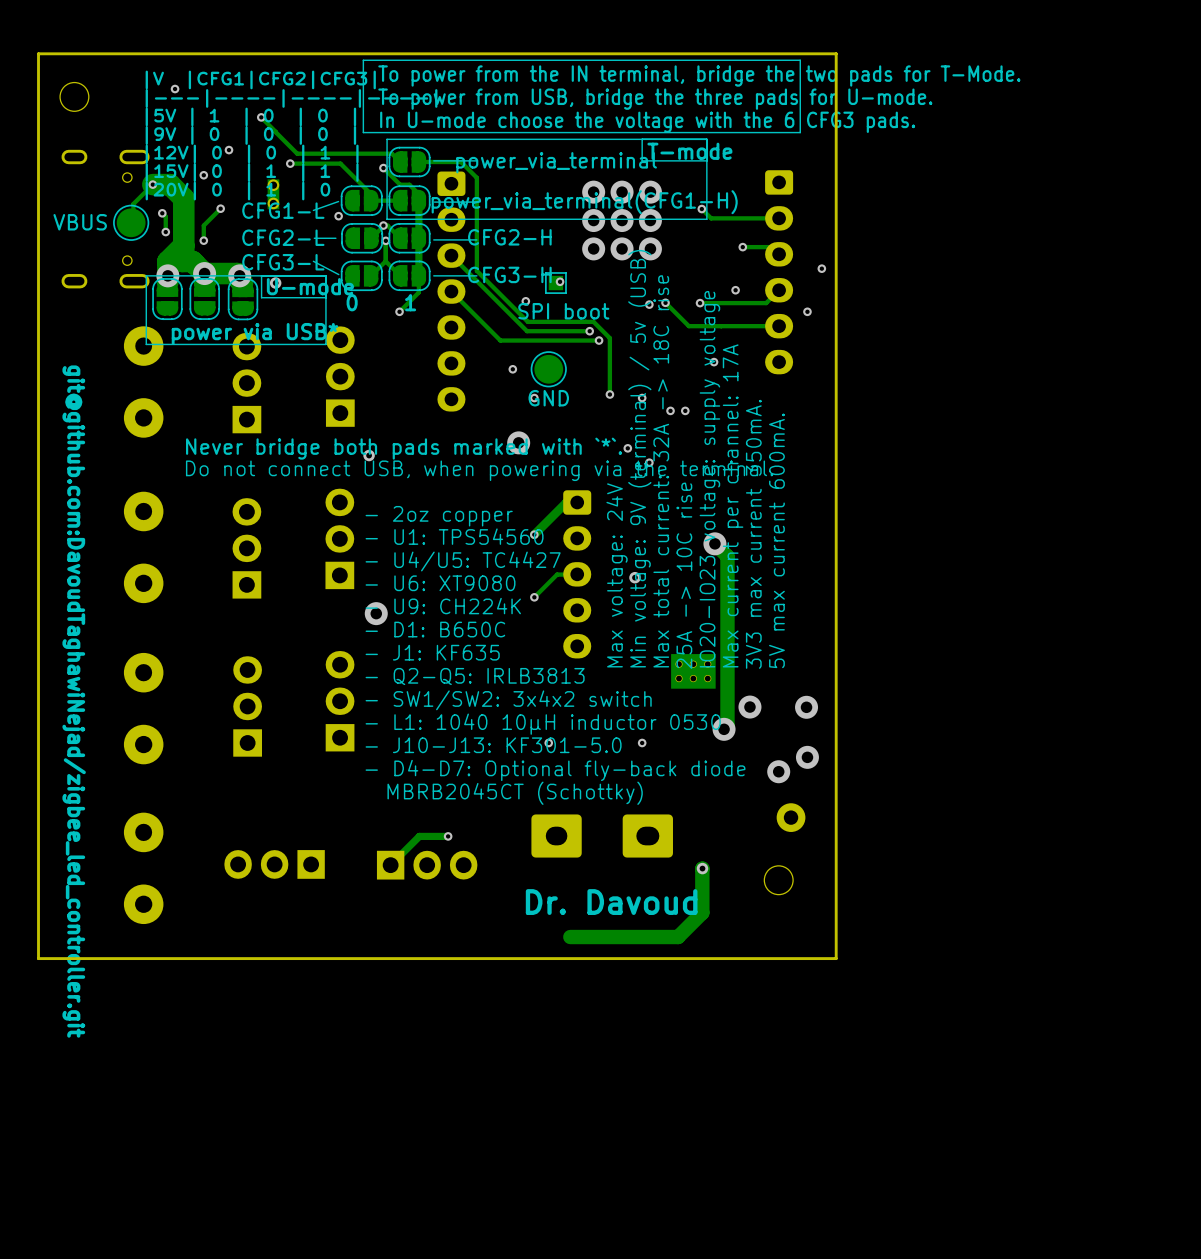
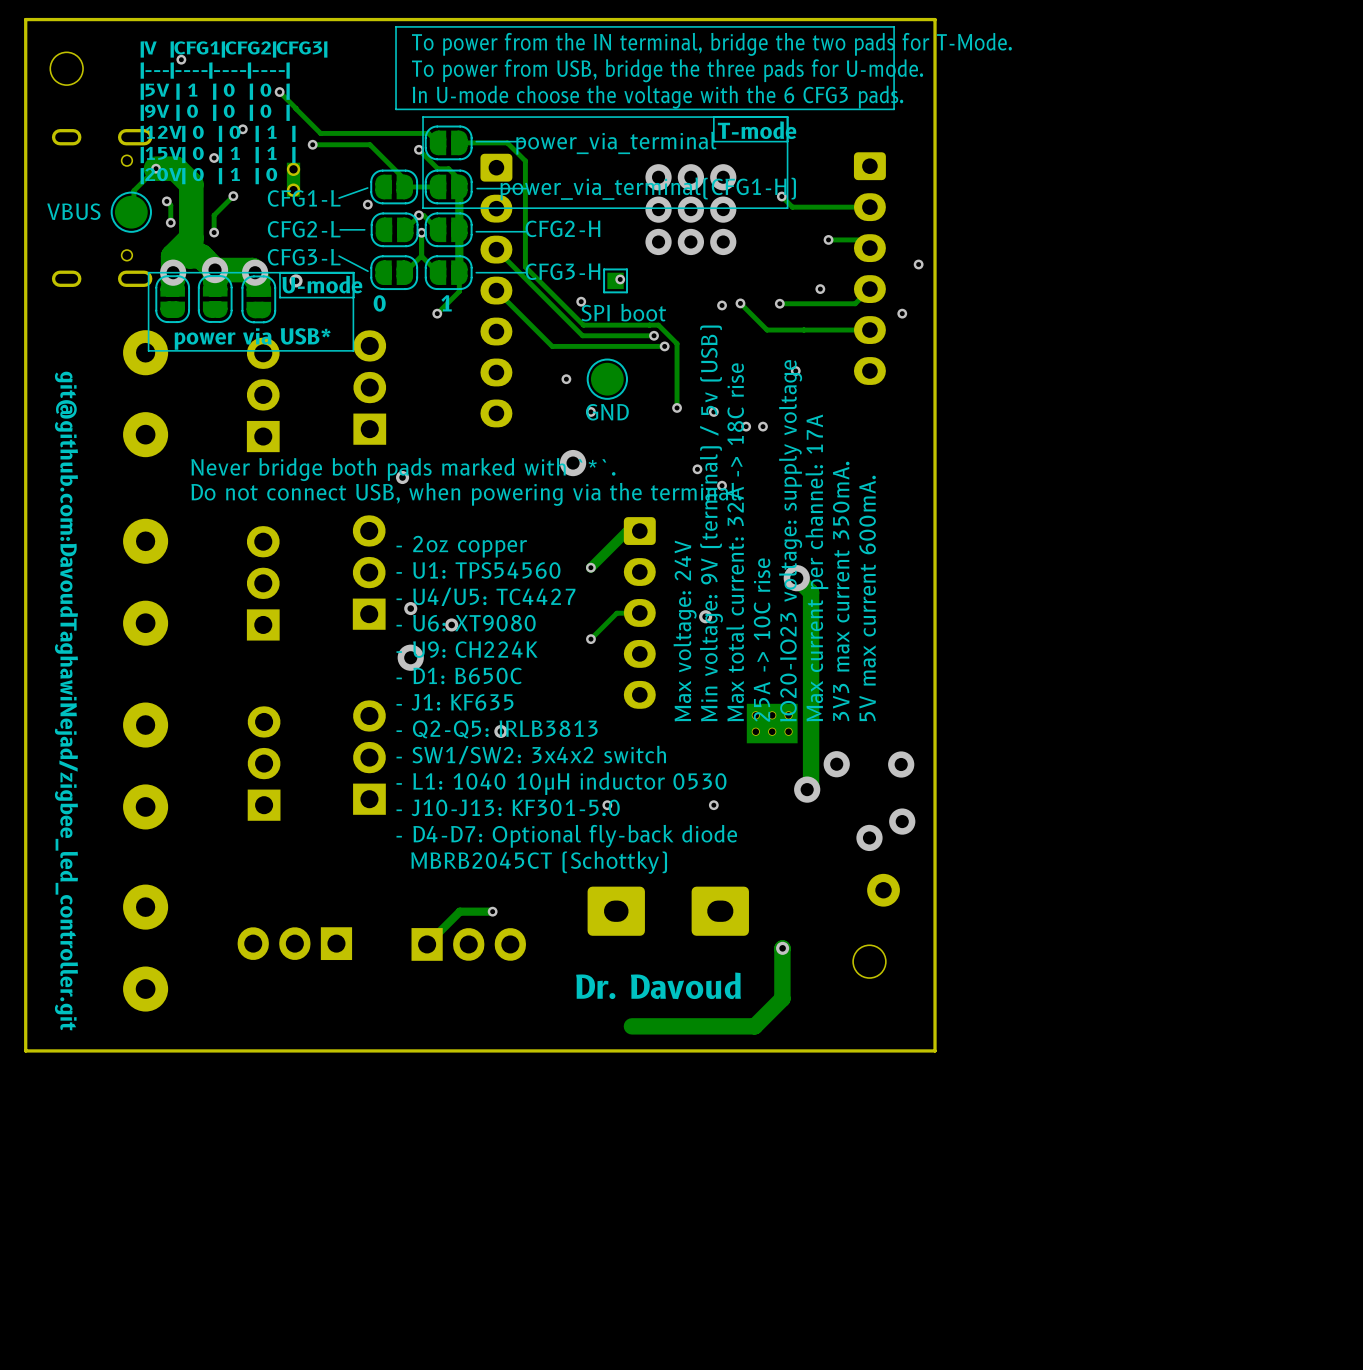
via: none -> (410, 608)
via: none -> (451, 624)
via: none -> (500, 731)

